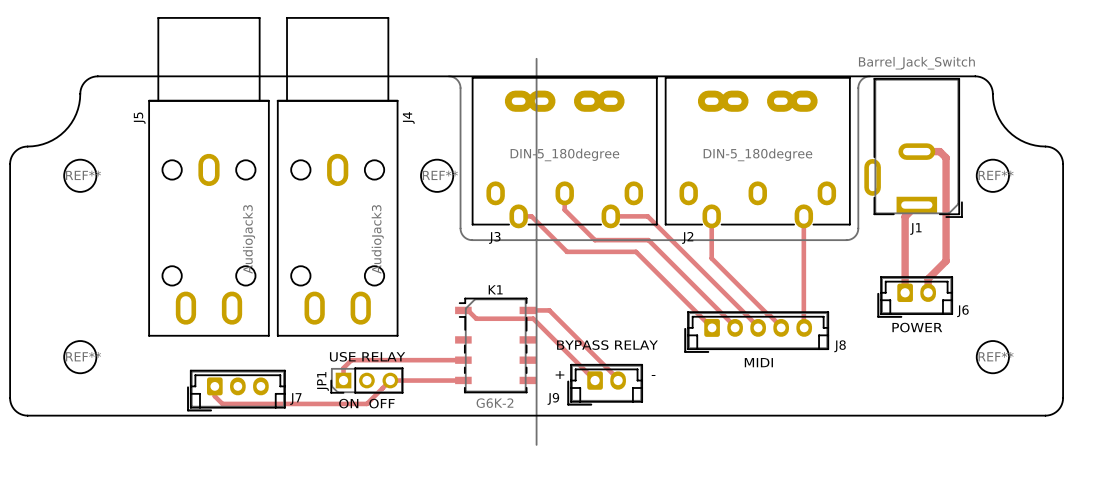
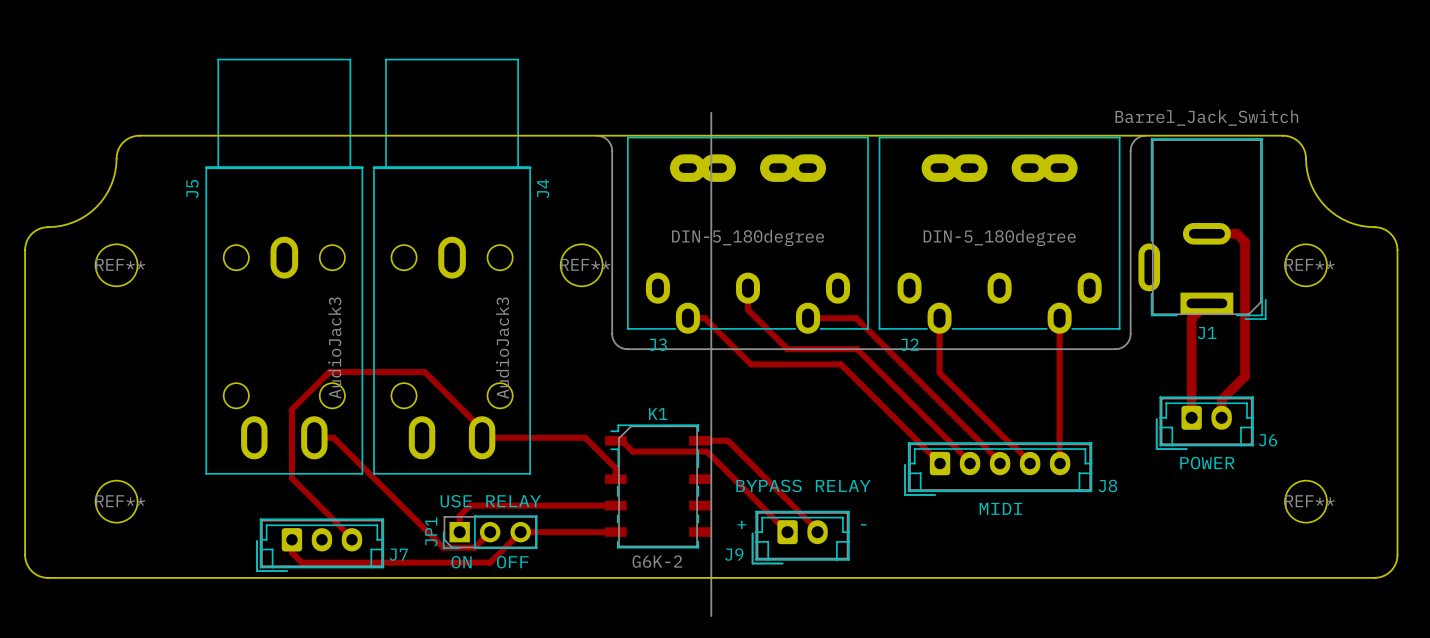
track: none -> (314, 437) (333, 437) (443, 547) (474, 547) (490, 532)
track: none -> (615, 479) (615, 468) (585, 437) (482, 437) (482, 429) (424, 372) (329, 372) (291, 409) (291, 478) (351, 539)

